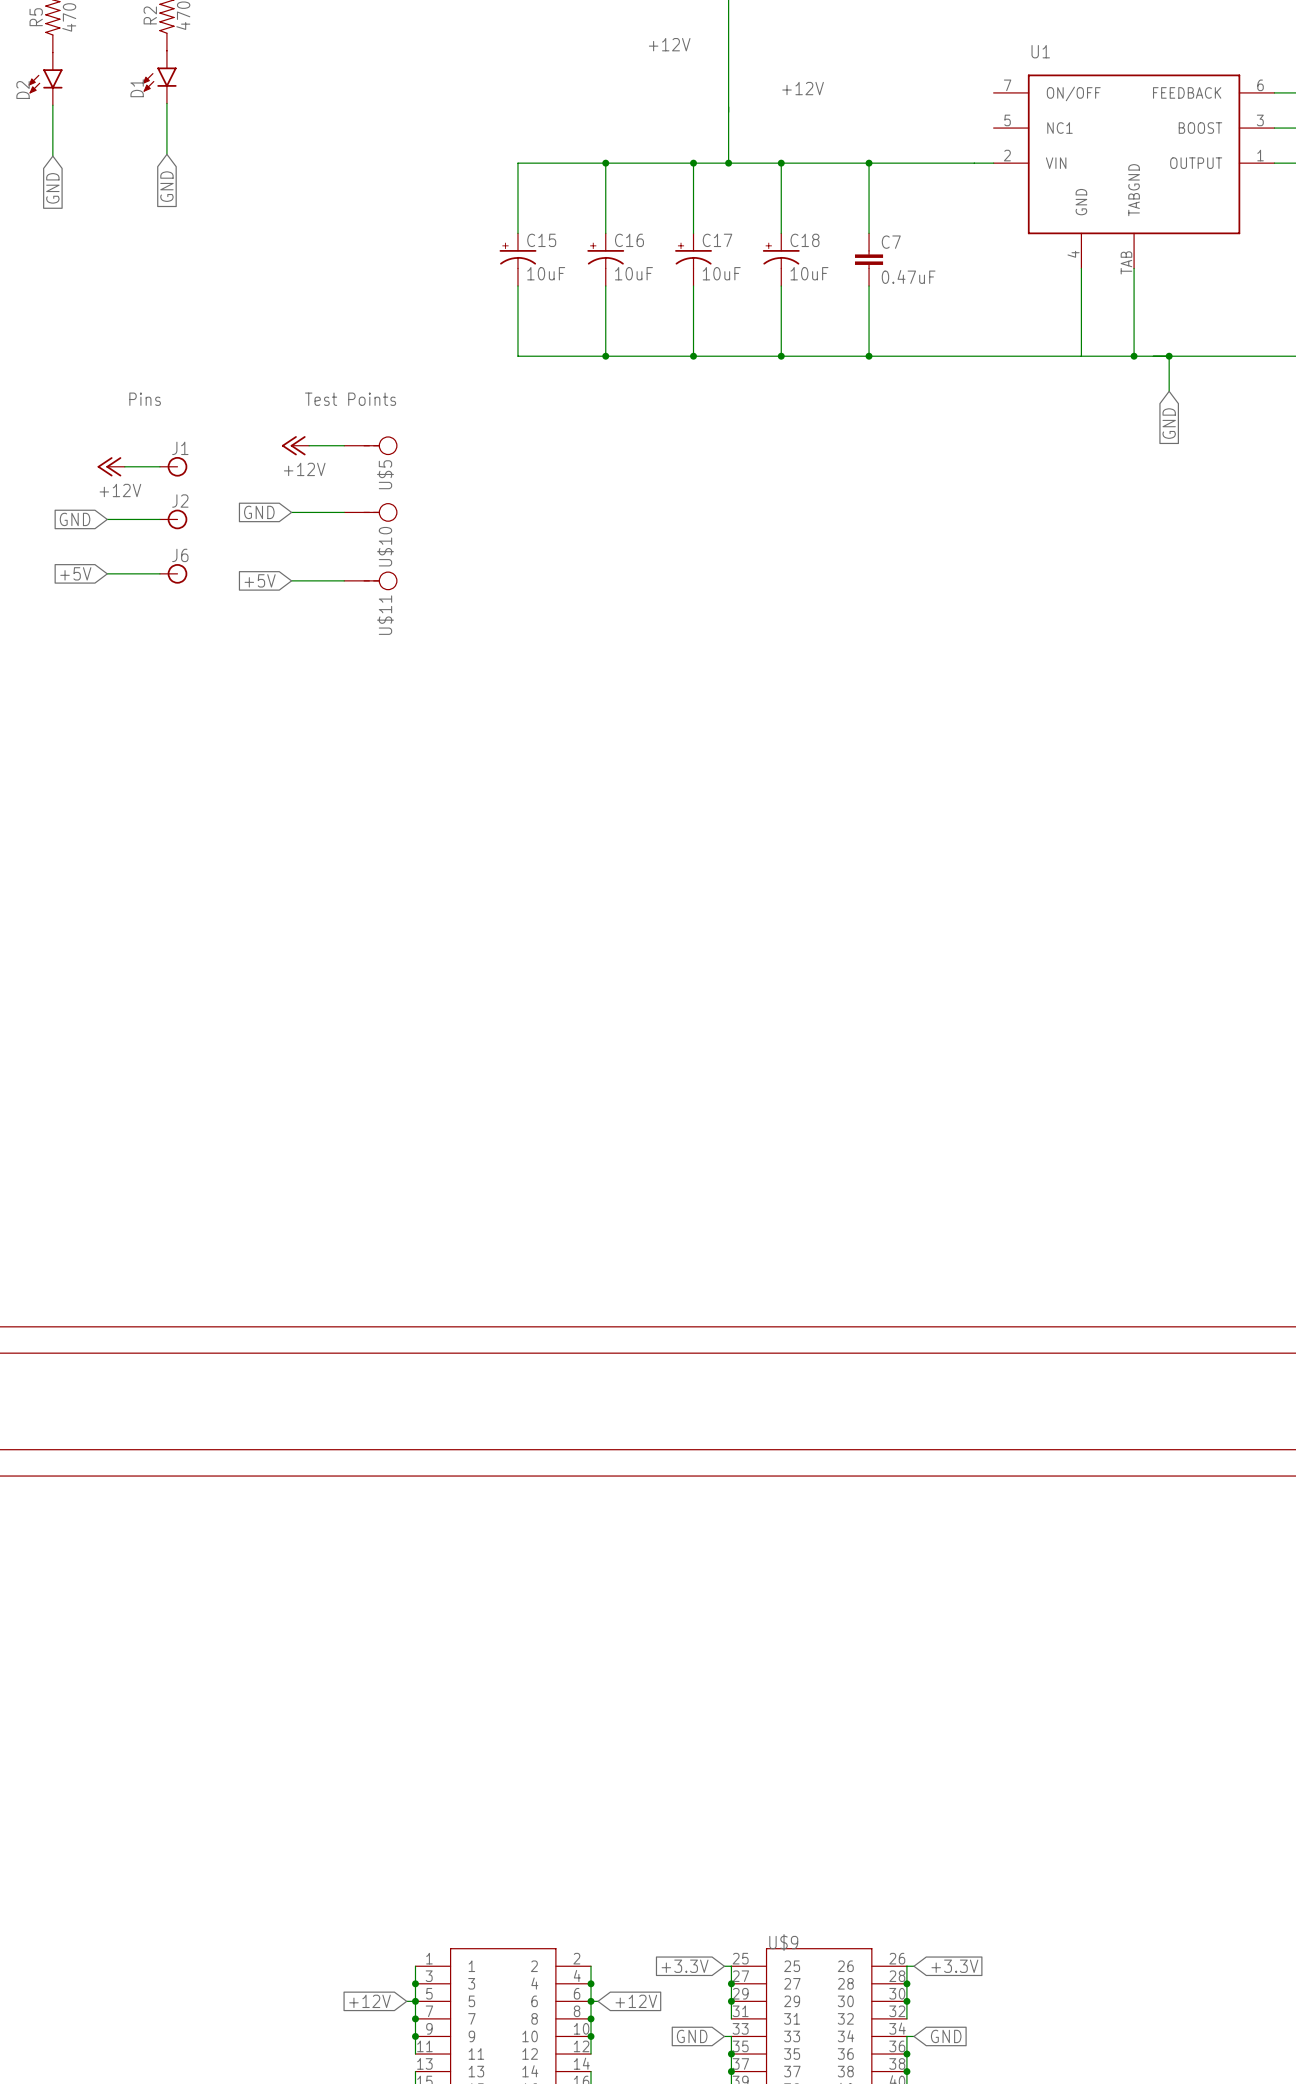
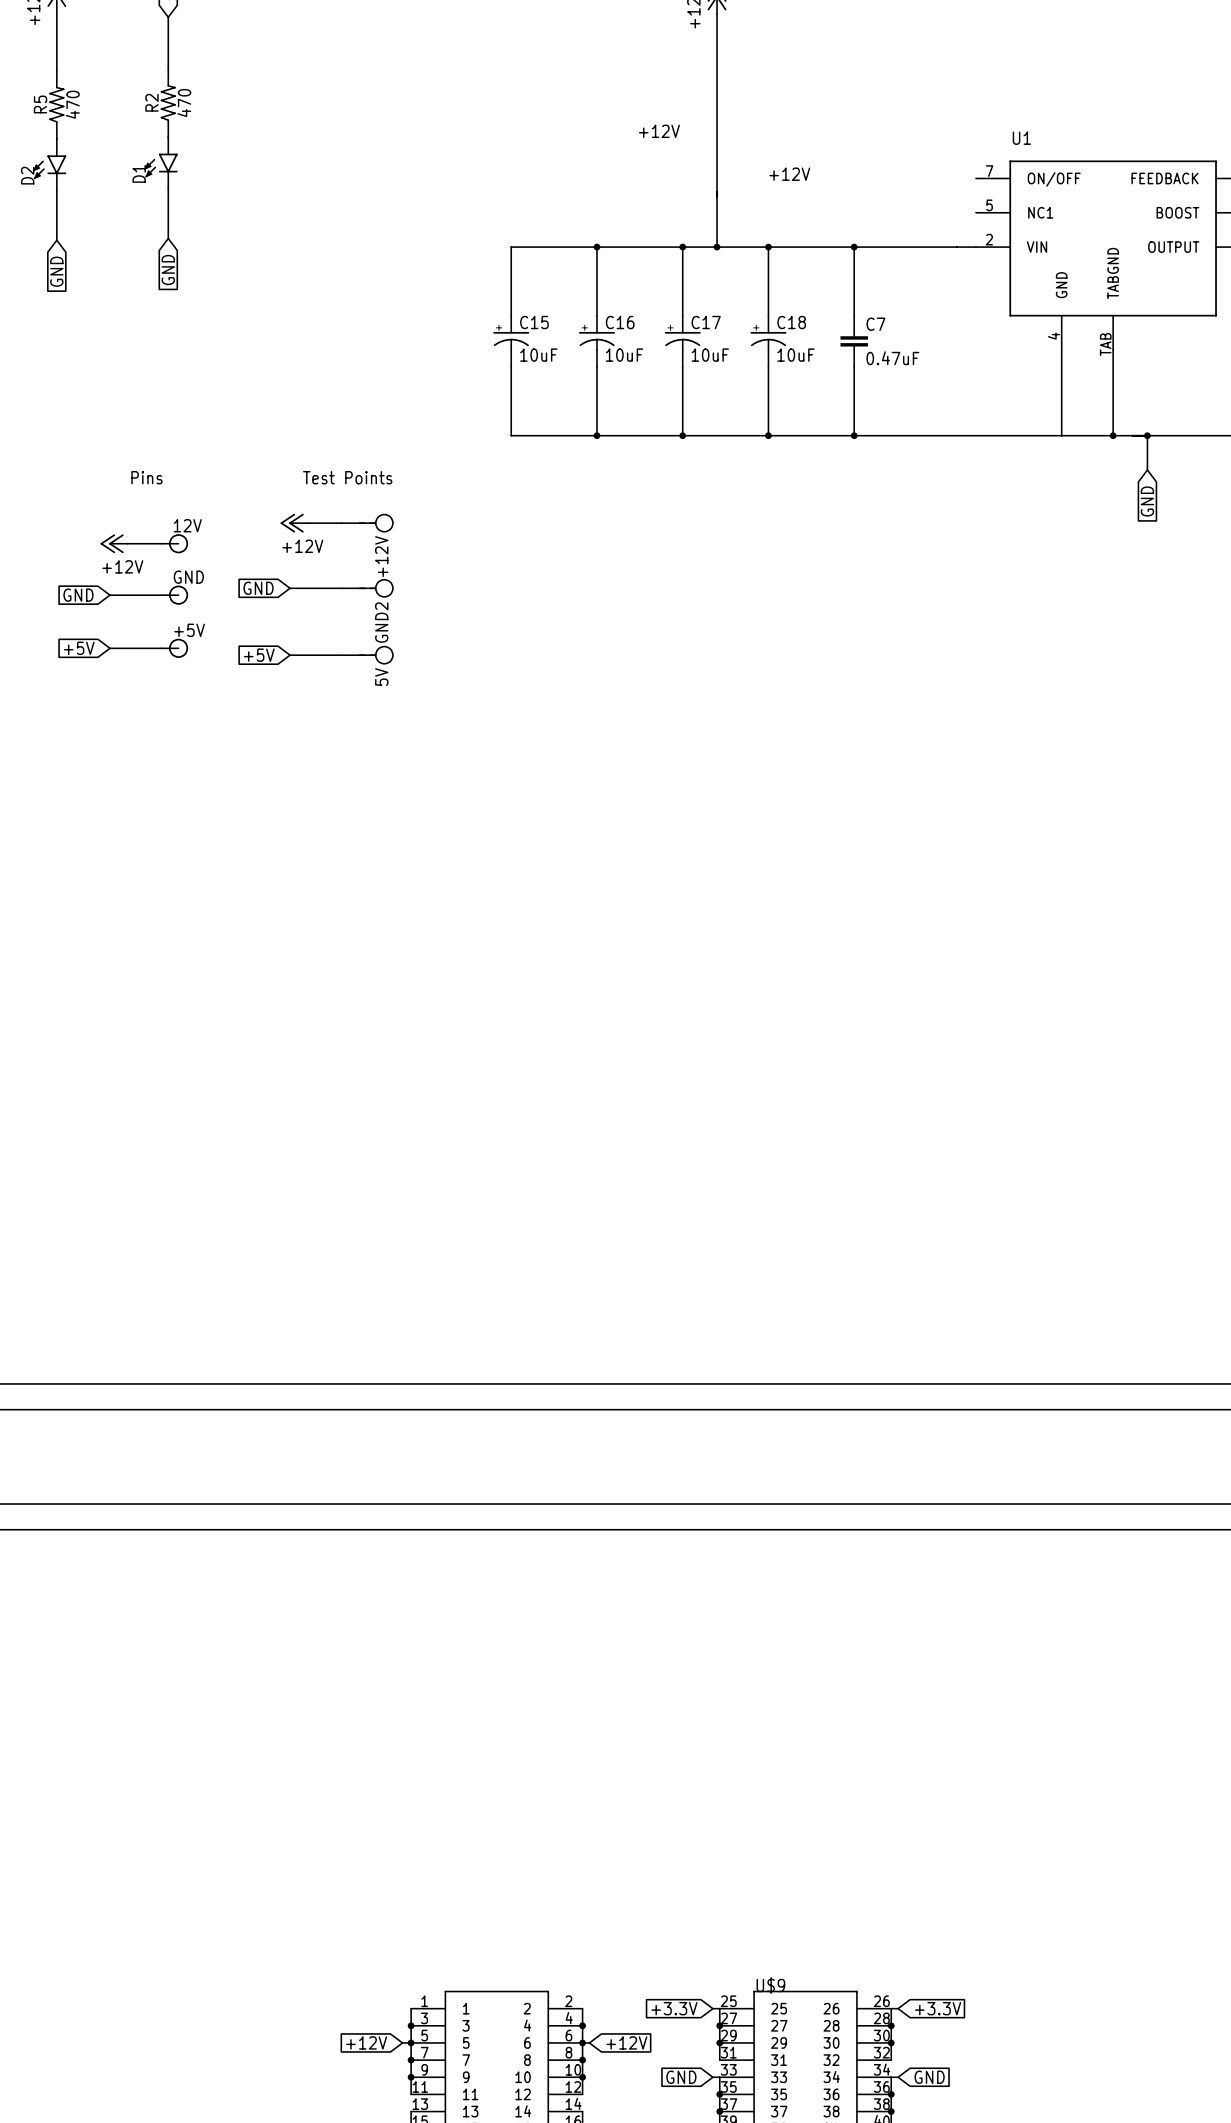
J1 name: J1 (180, 448) -> 12V (187, 525)
U$5 name: U$5 (385, 474) -> +12V (381, 556)
J2 name: J2 (180, 501) -> GND (188, 577)
U$10 name: U$10 (385, 546) -> GND2 (381, 622)
J6 name: J6 (180, 555) -> +5V (189, 630)
U$11 name: U$11 (385, 615) -> 5V (381, 677)

